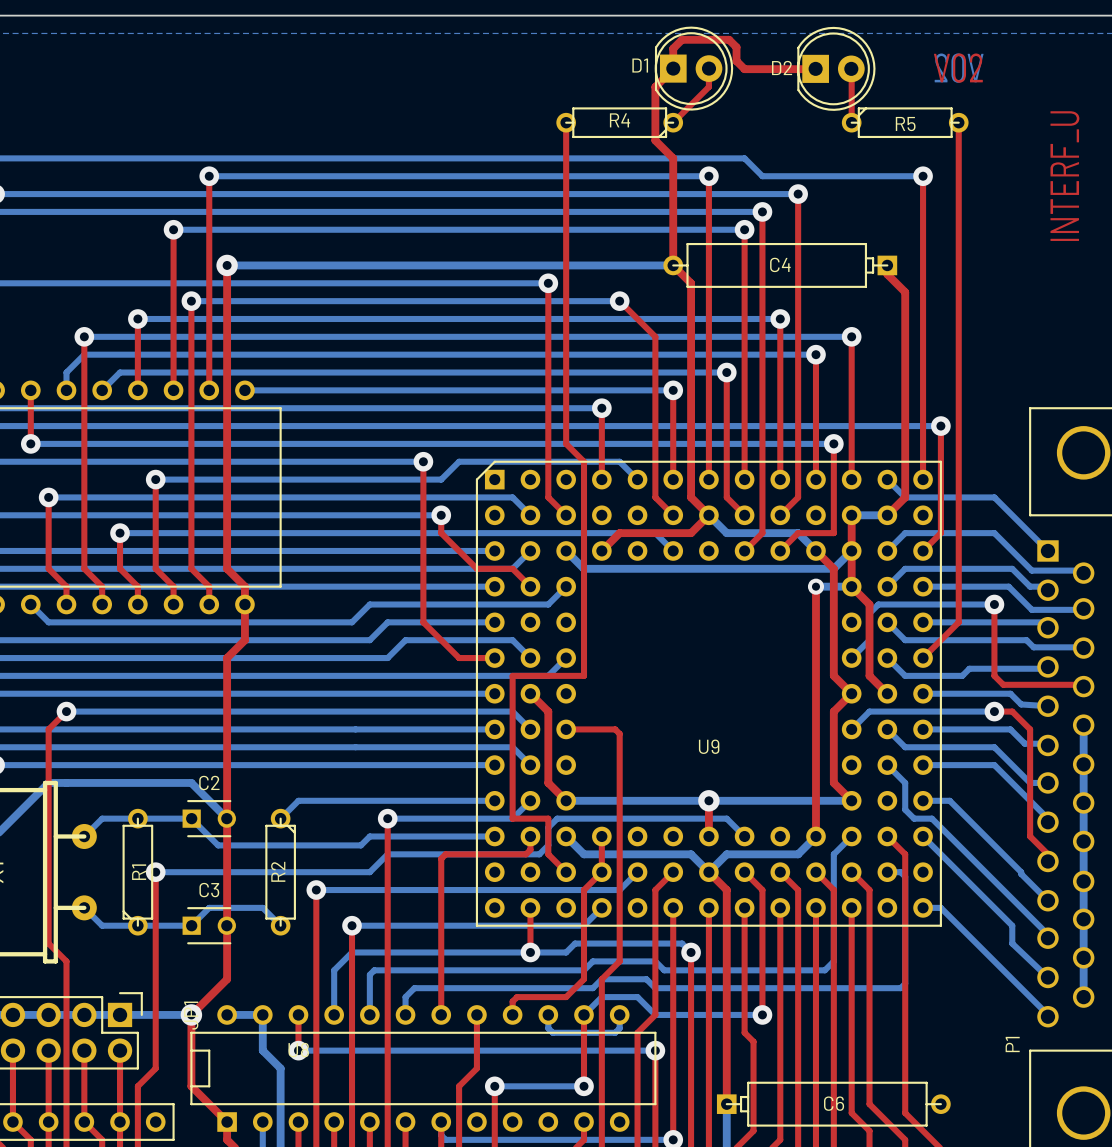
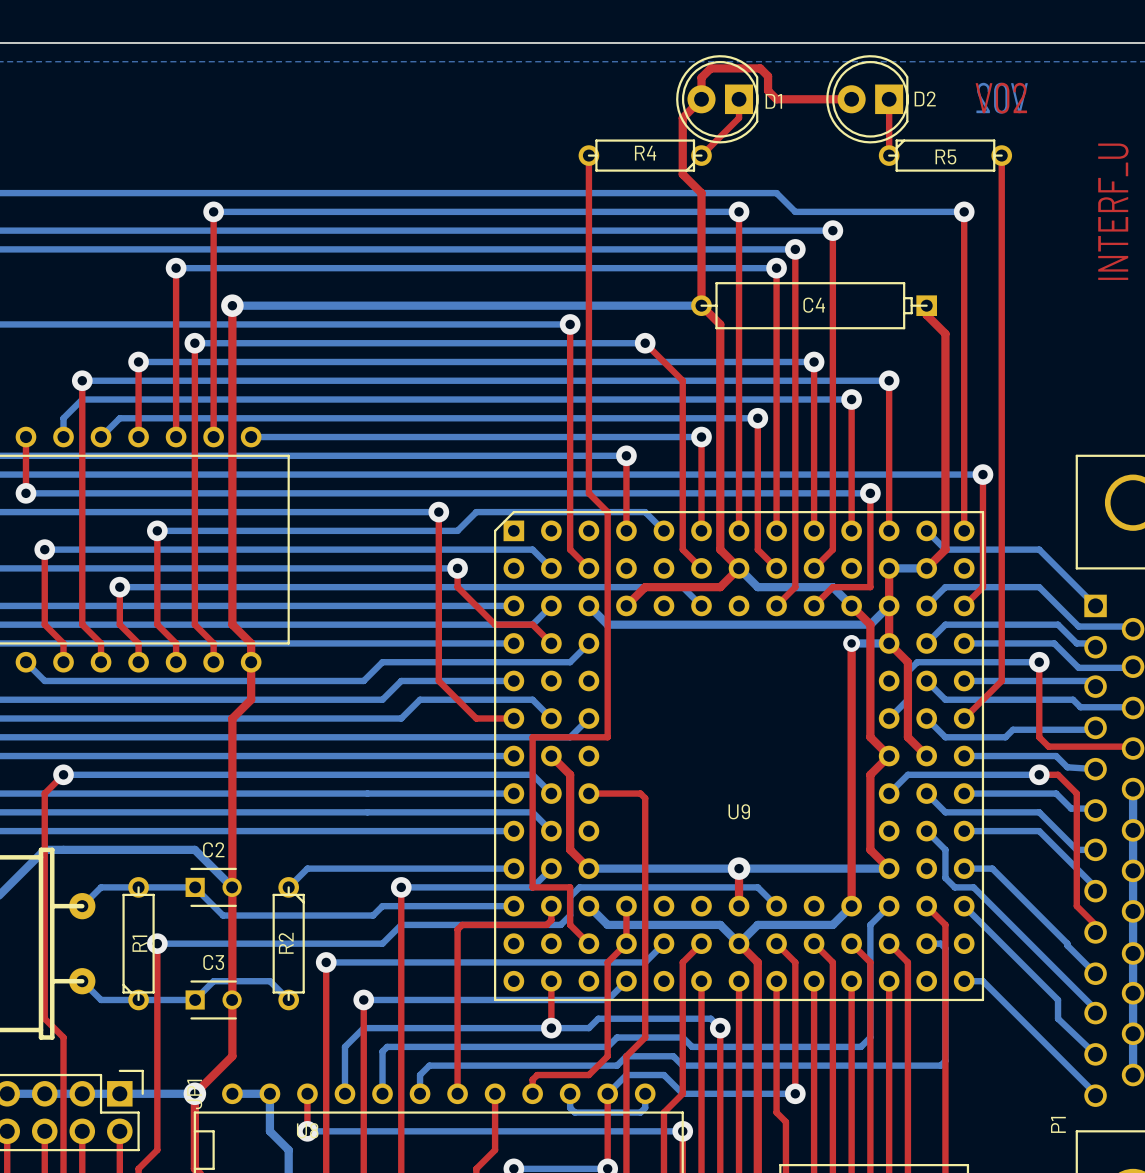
D1 rotation: 0° (693, 68) -> 180° (717, 99)
D2 rotation: 0° (836, 68) -> 180° (867, 99)

